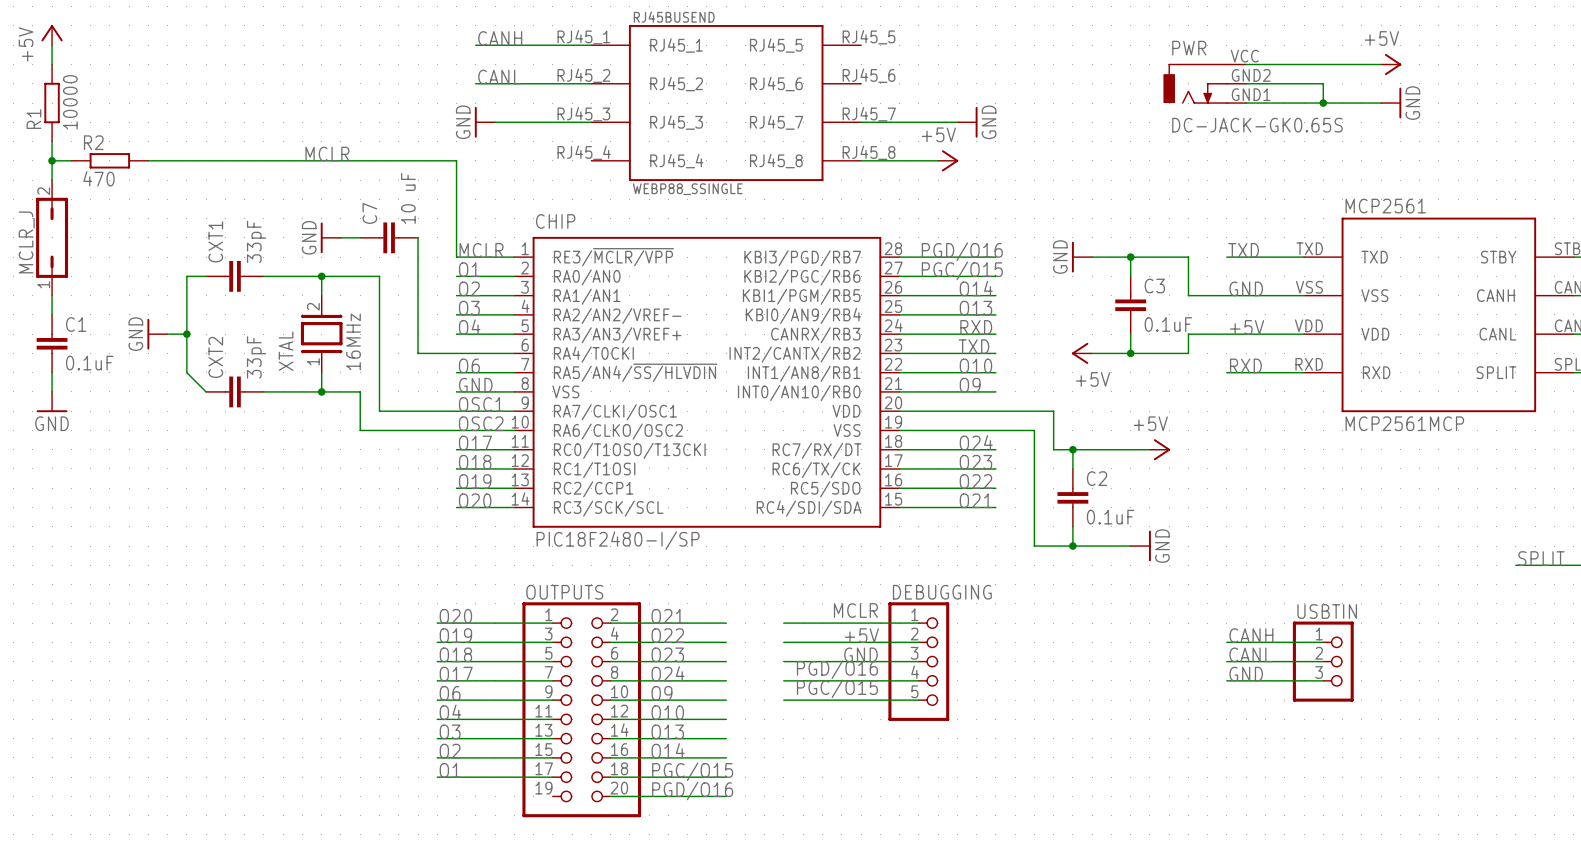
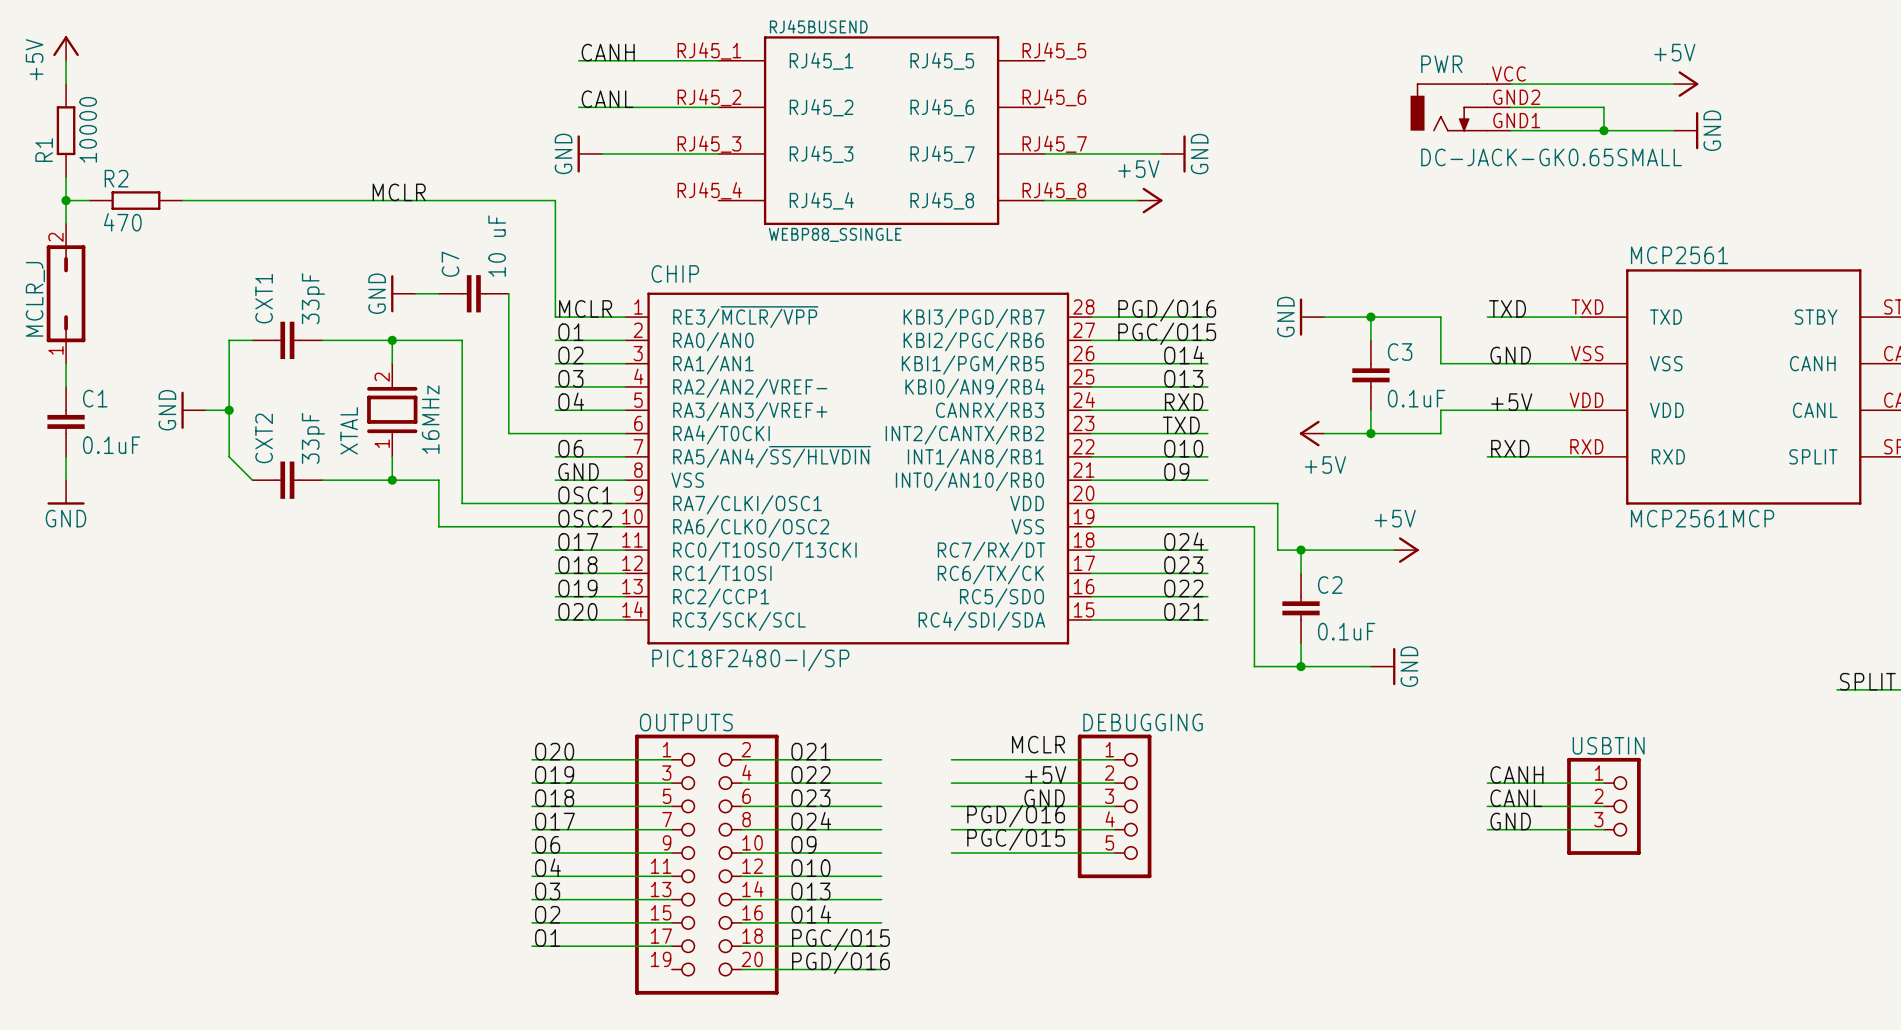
PWR value: DC-JACK-GK0.65S (1257, 125) -> DC-JACK-GK0.65SMALL (1551, 157)

